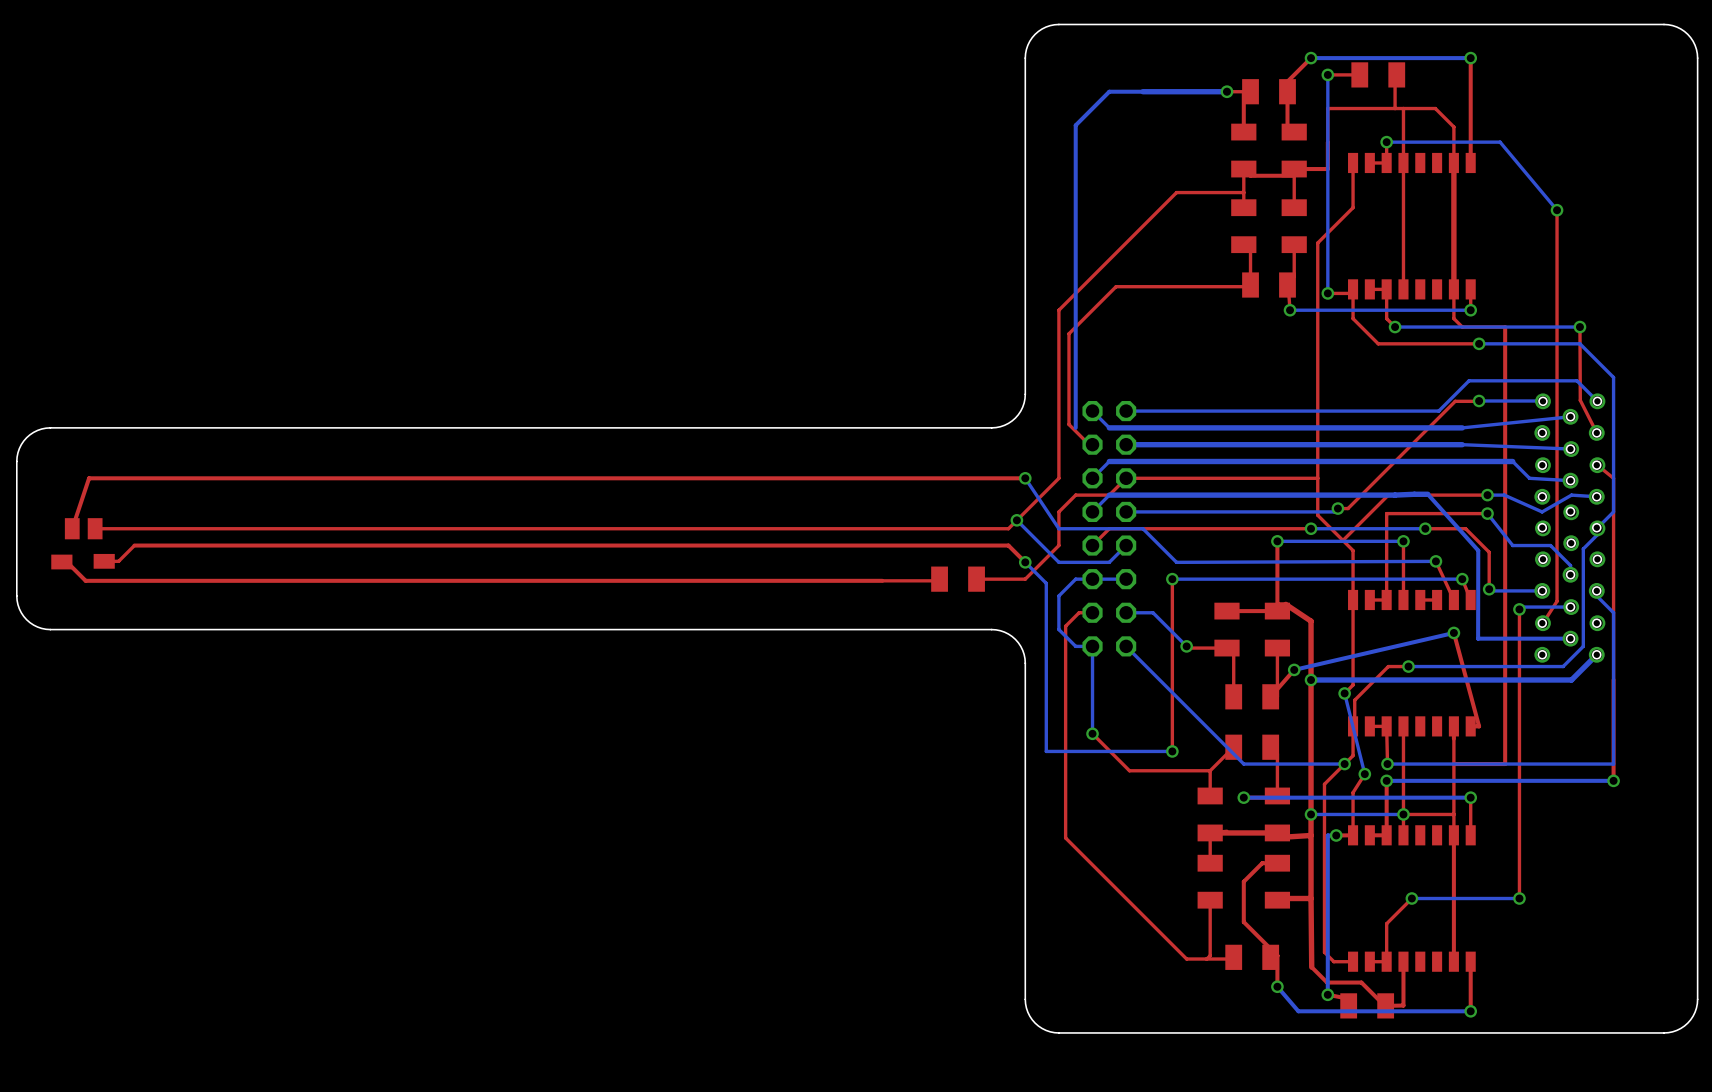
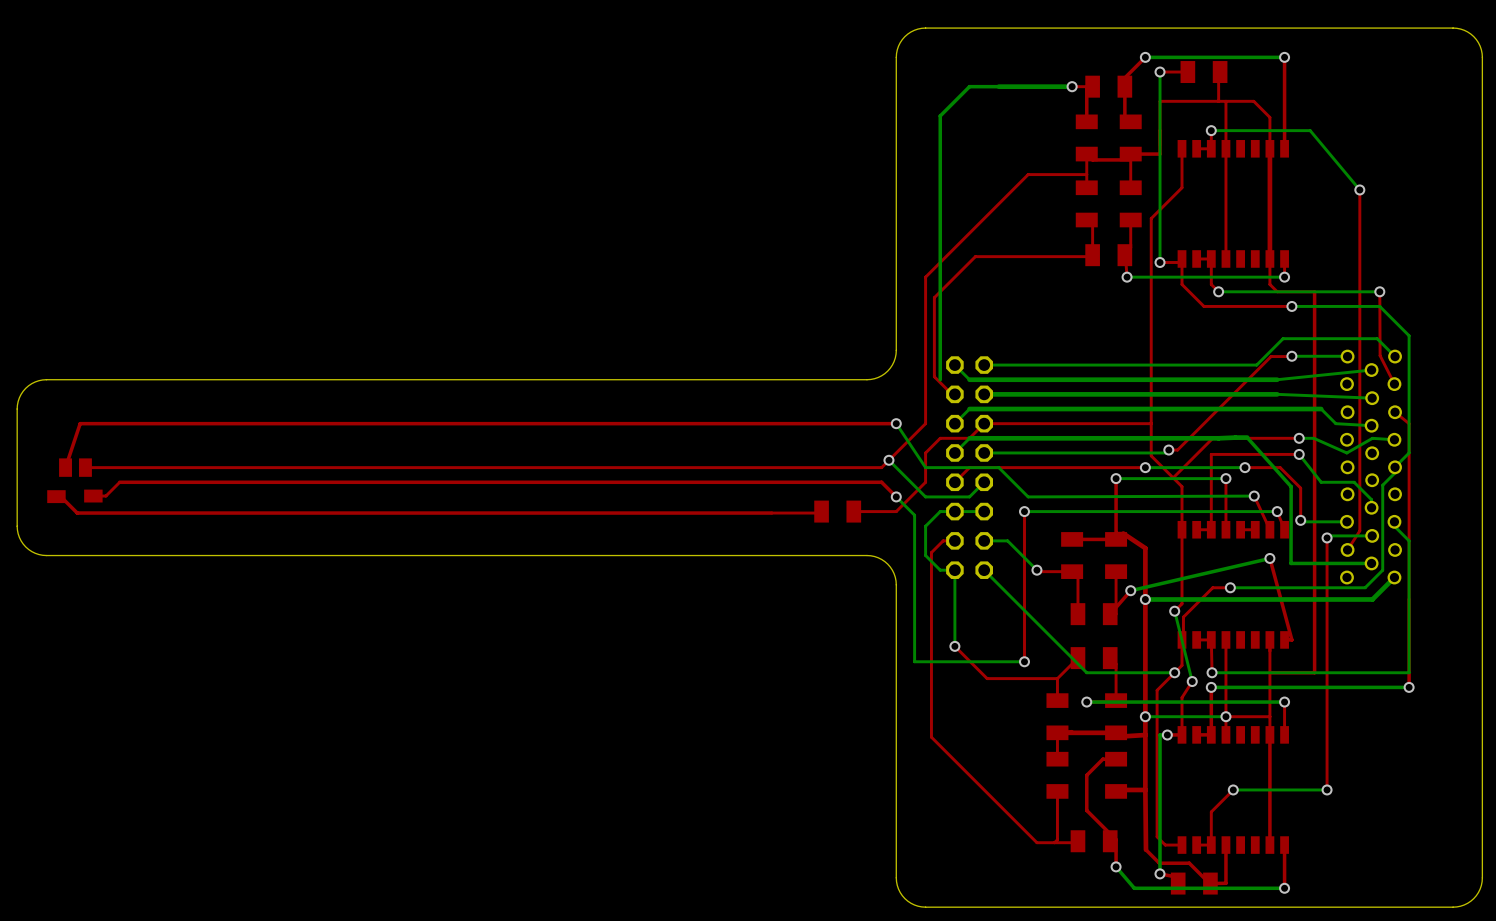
part footprint: [1534, 393, 1606, 663] -> [1340, 349, 1402, 585]

